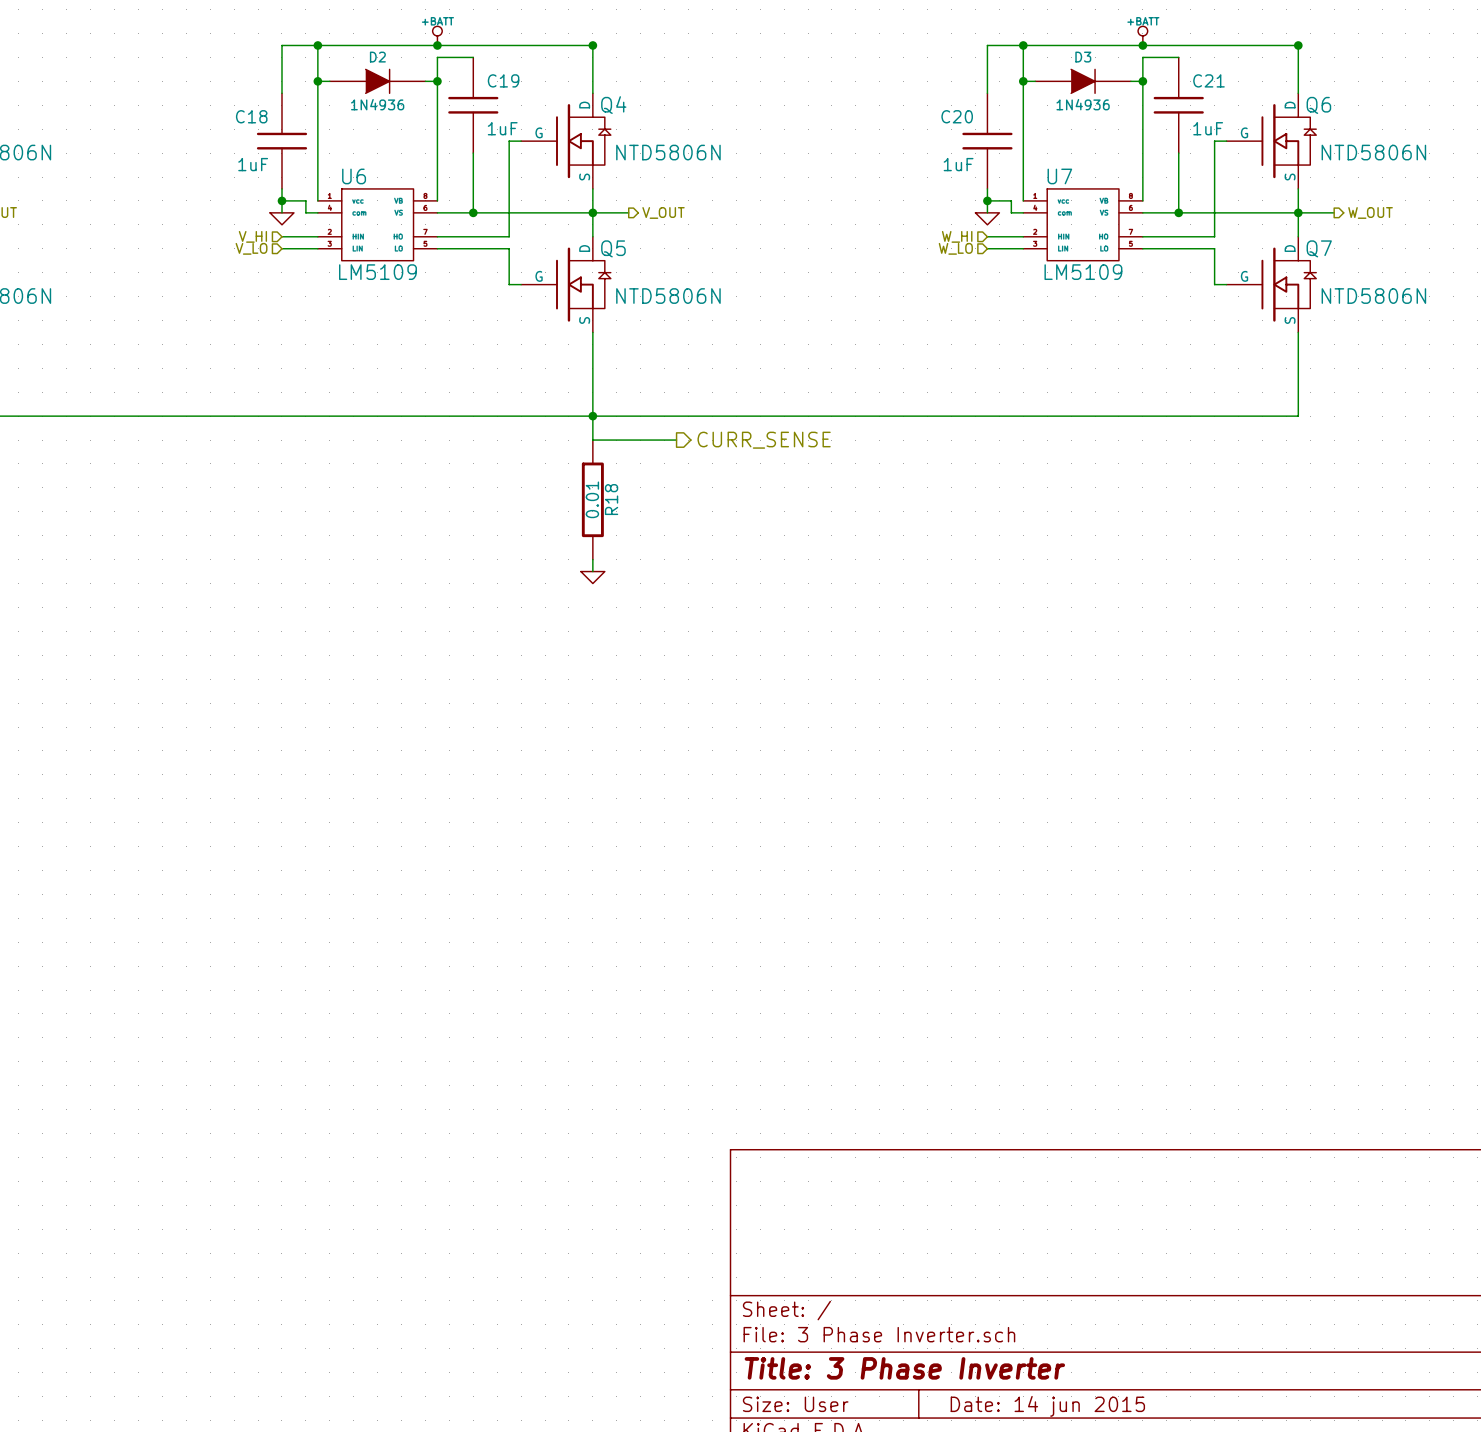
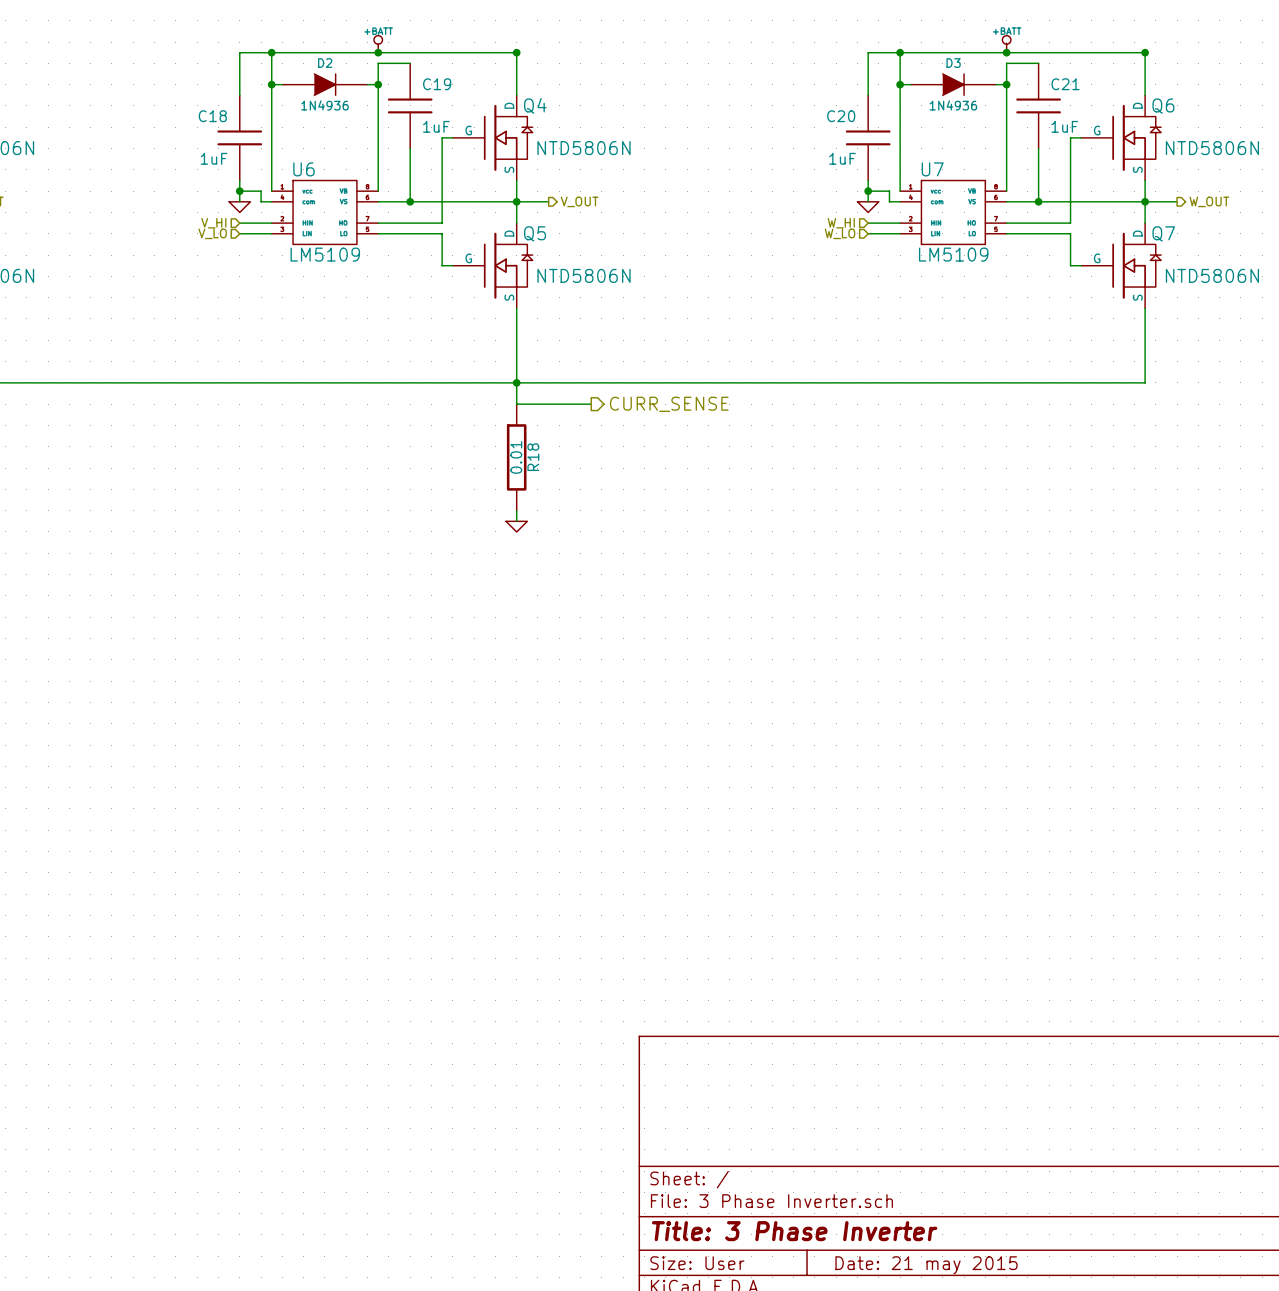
title block: Date: 14 jun 2015 (1047, 1406) -> Date: 21 may 2015 (926, 1265)

